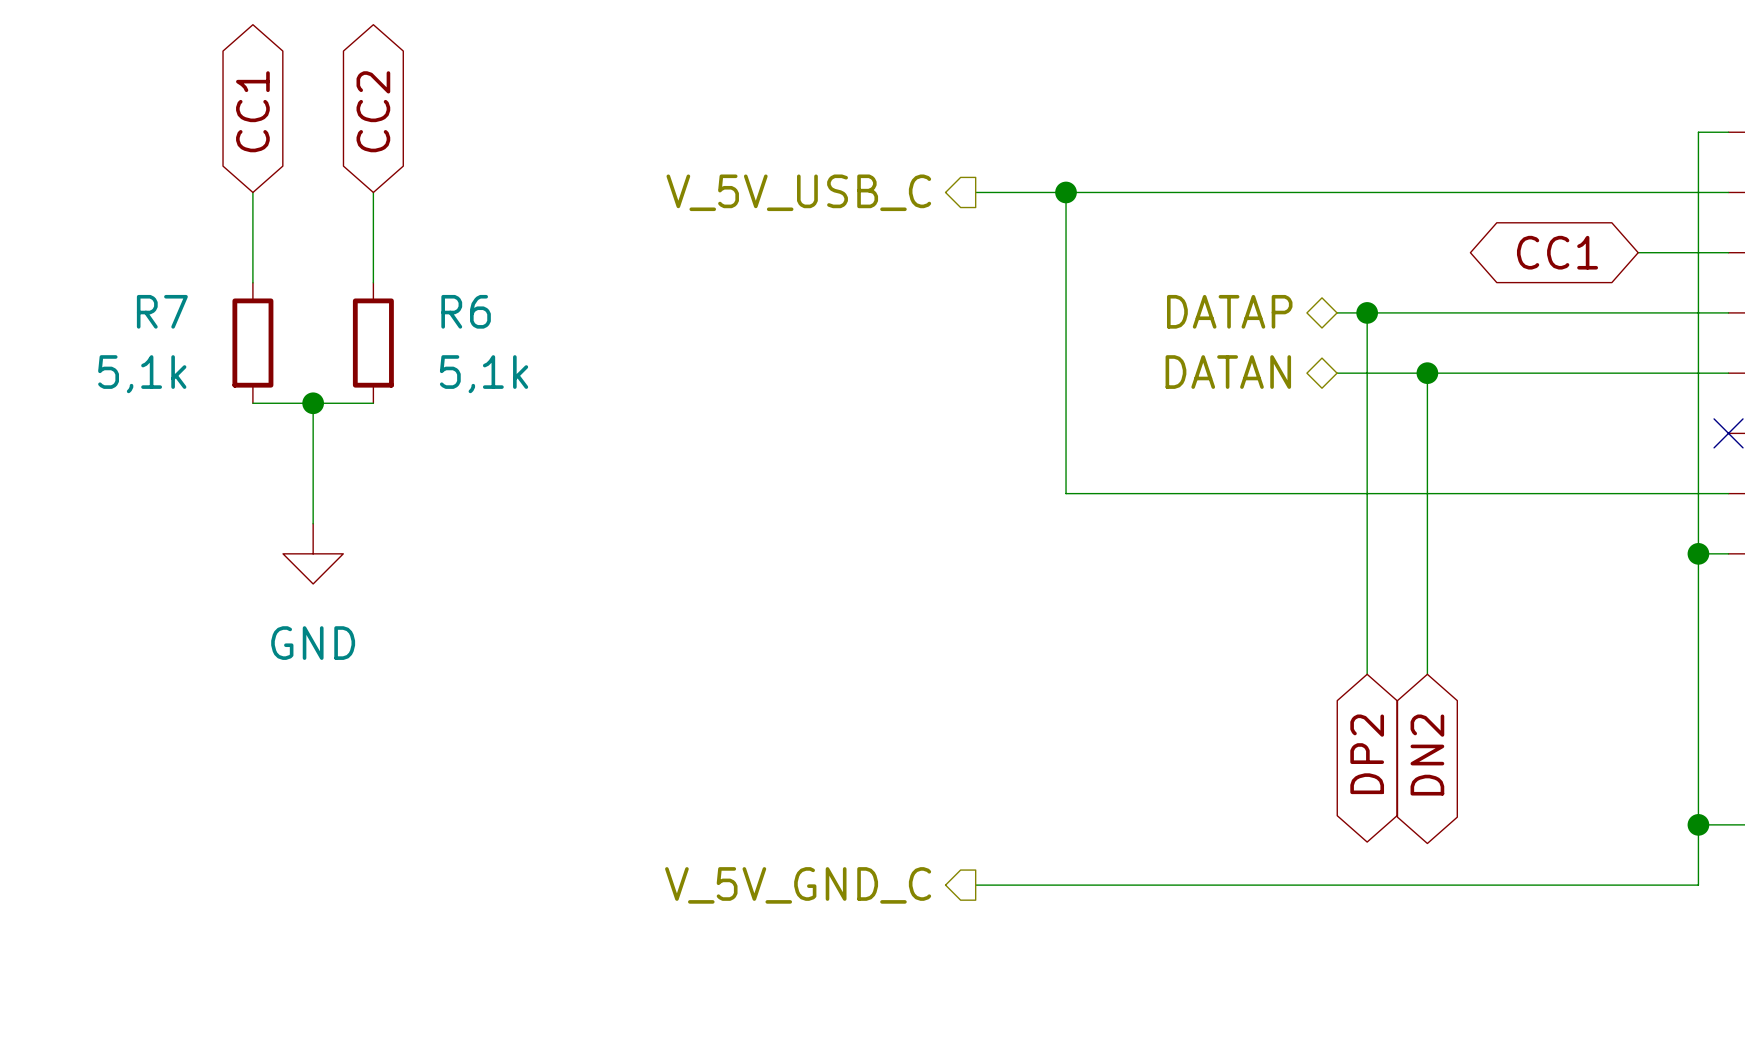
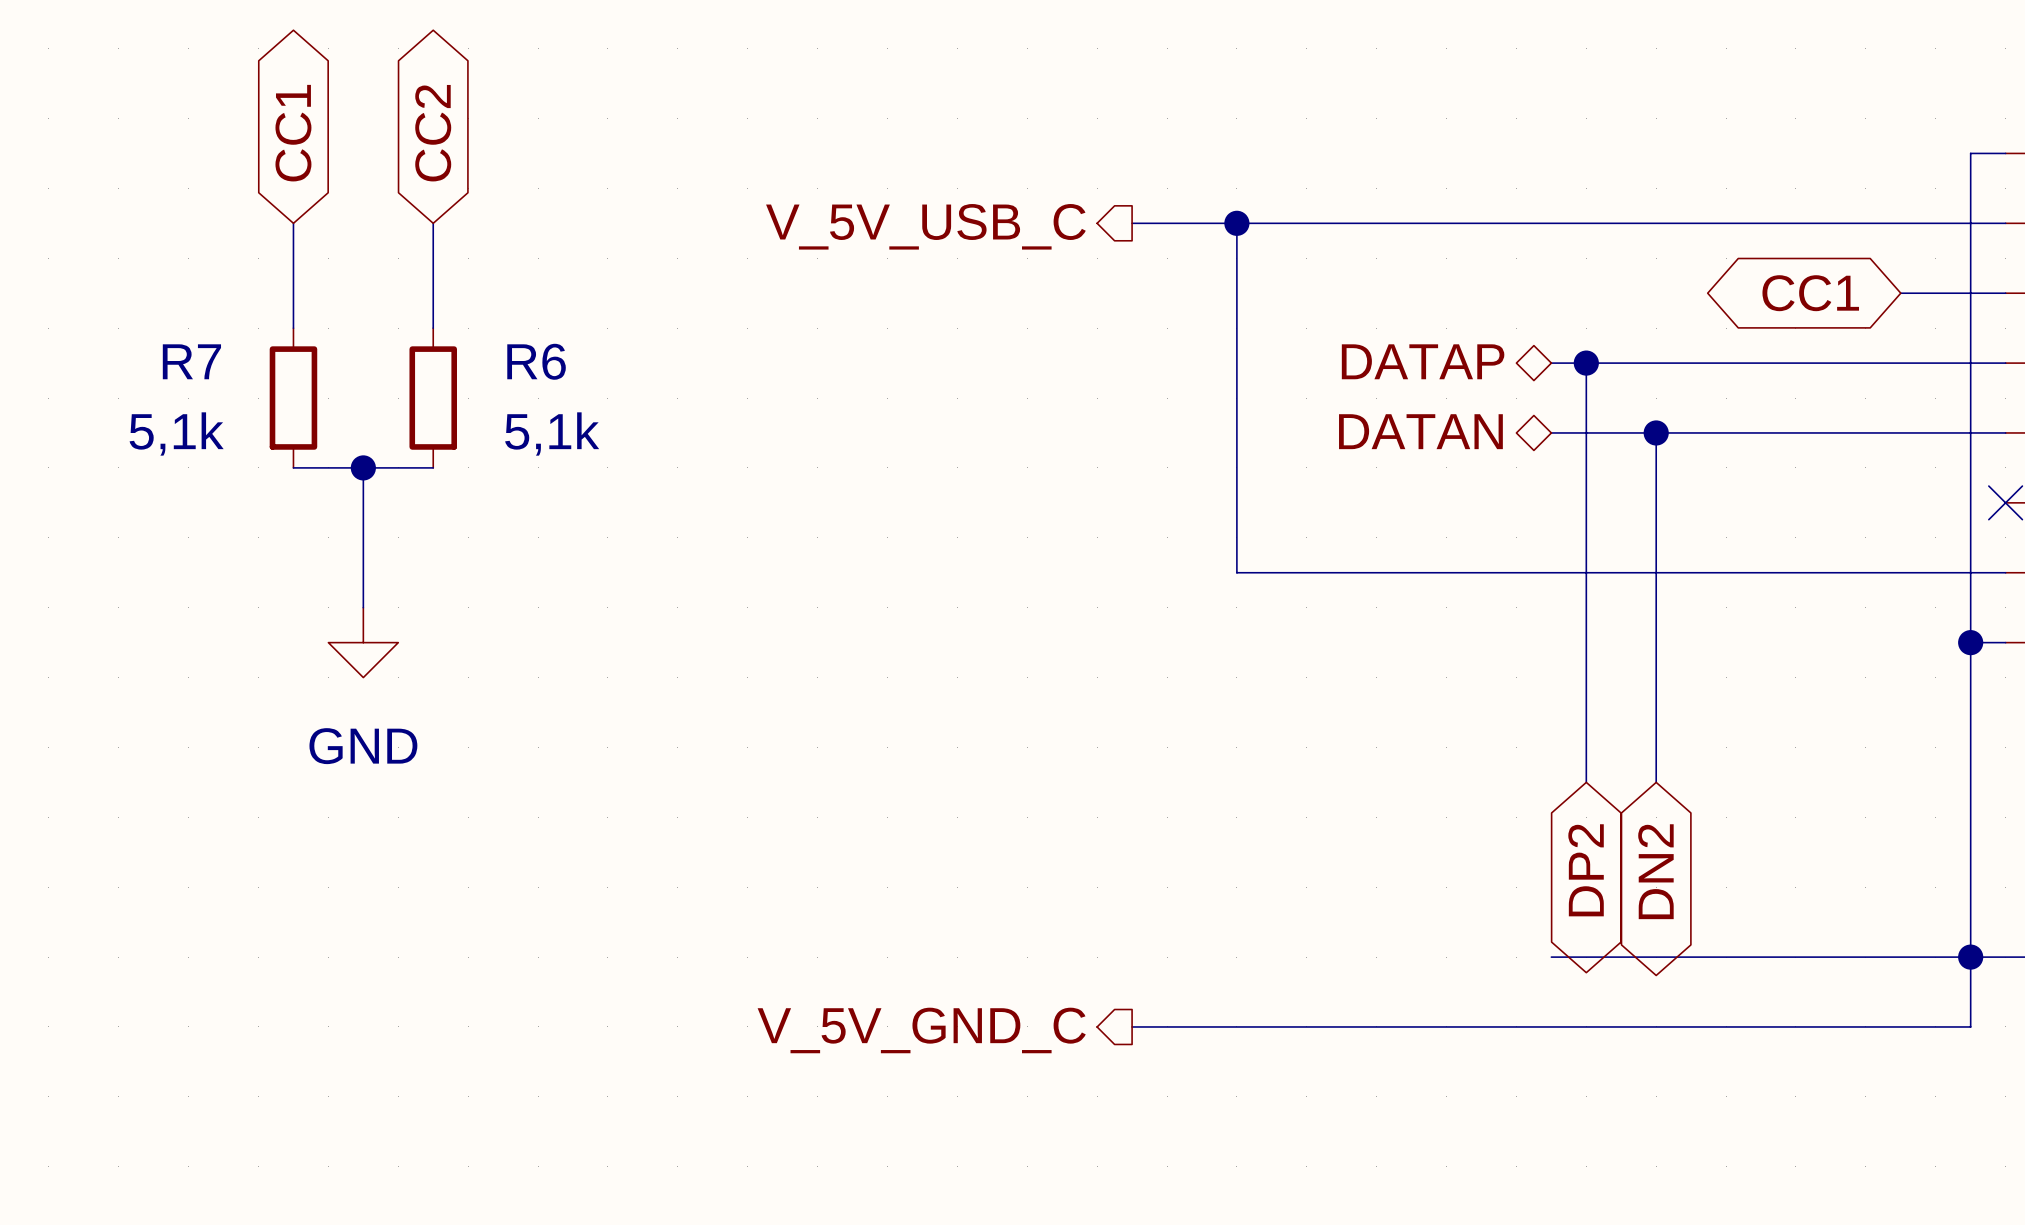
wire: none -> (1551, 957) (1970, 957)

